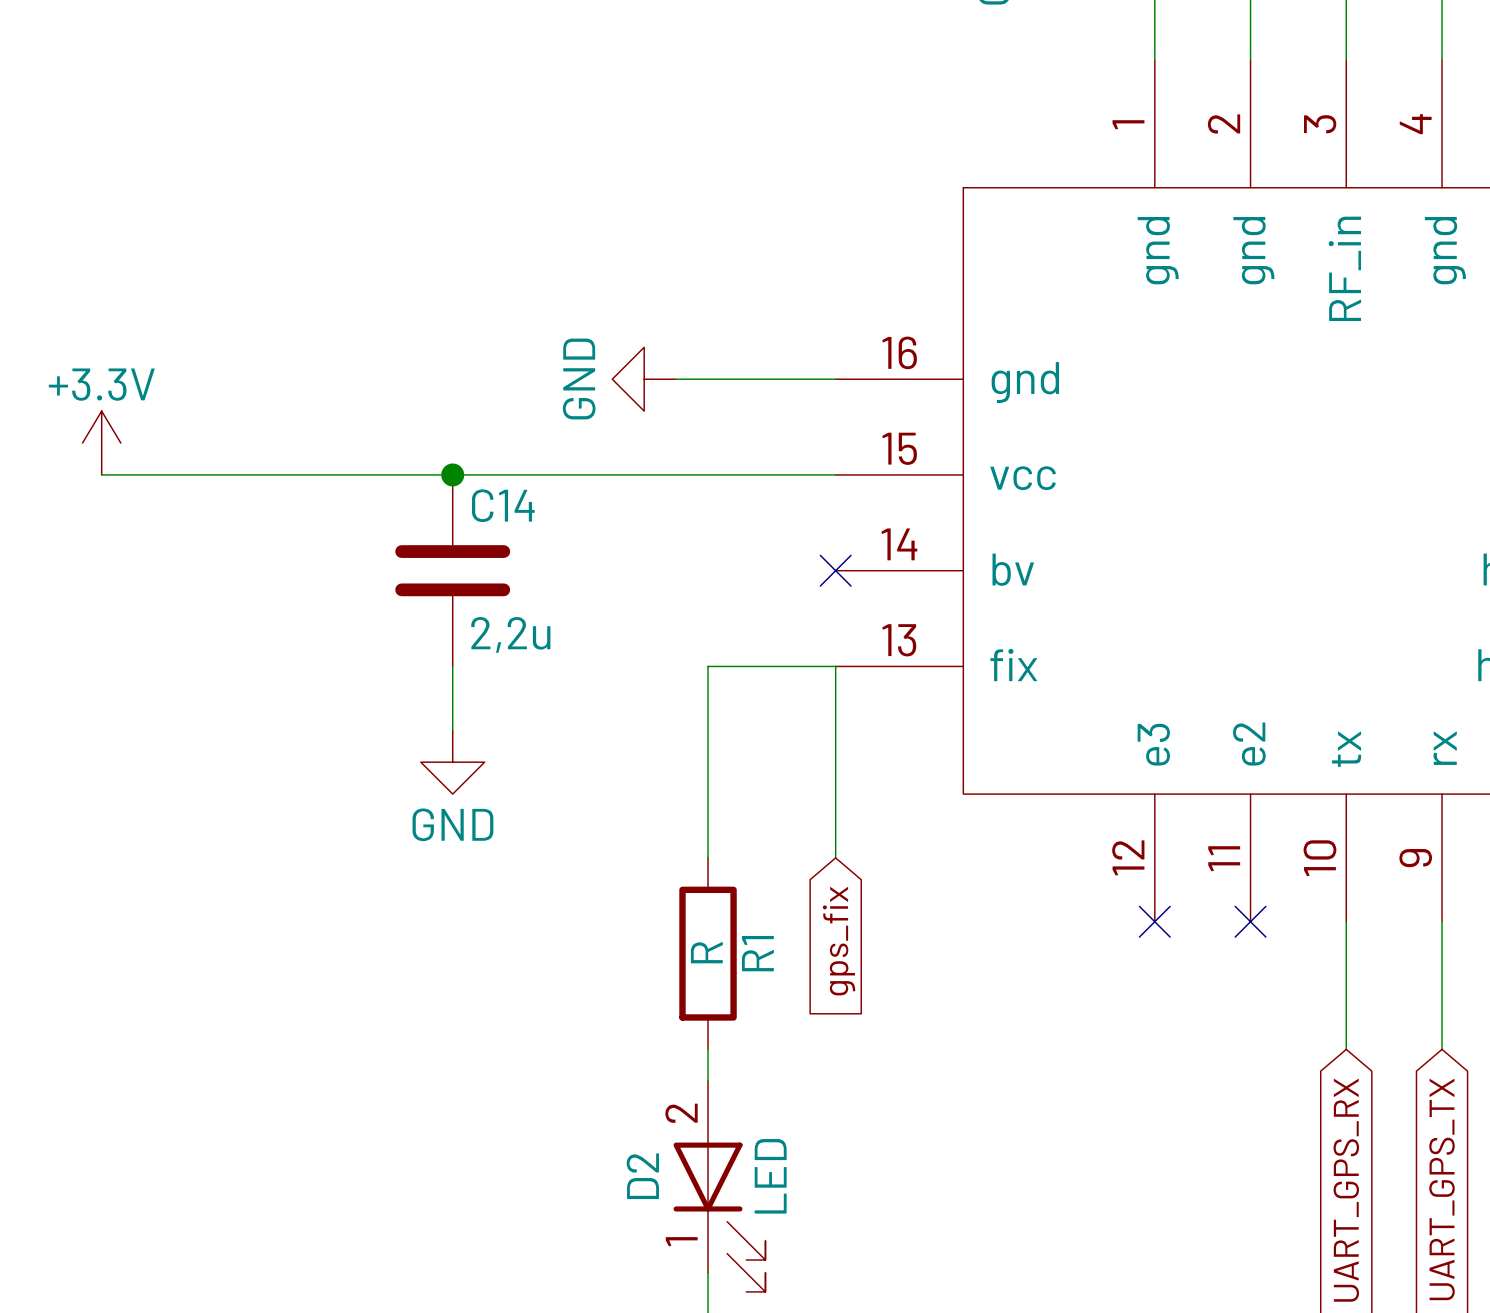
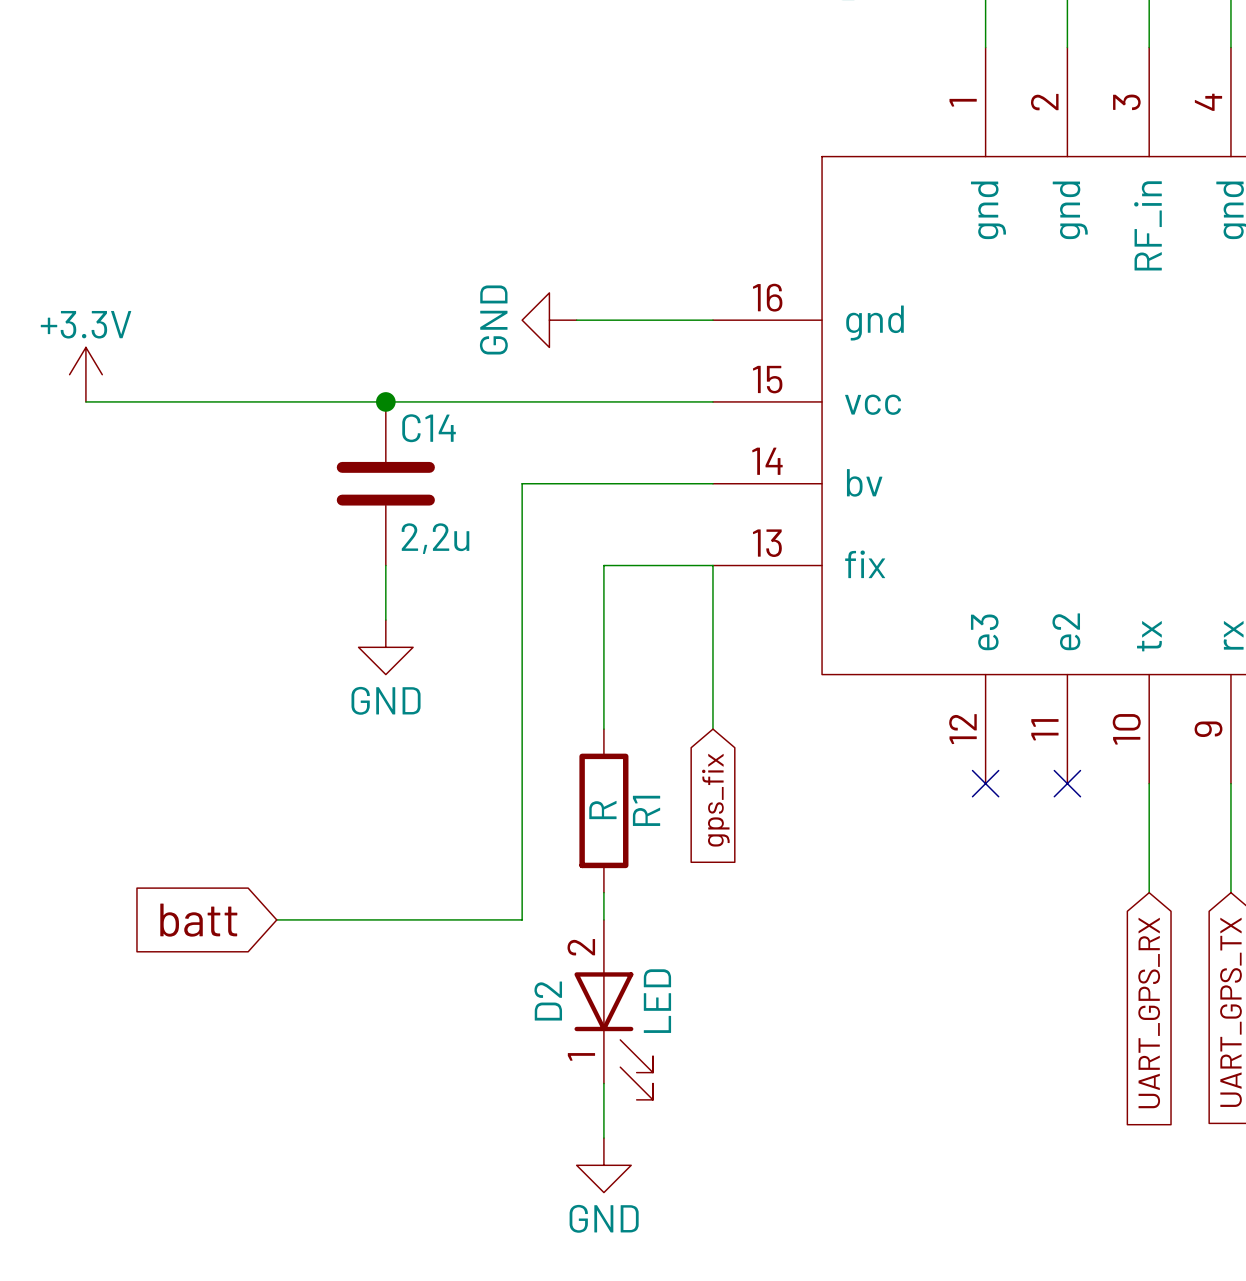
wire: none -> (712, 483) (522, 483) (522, 919) (276, 919)
no-connect mark: (835, 570) -> none
global label: none -> batt (198, 920)

